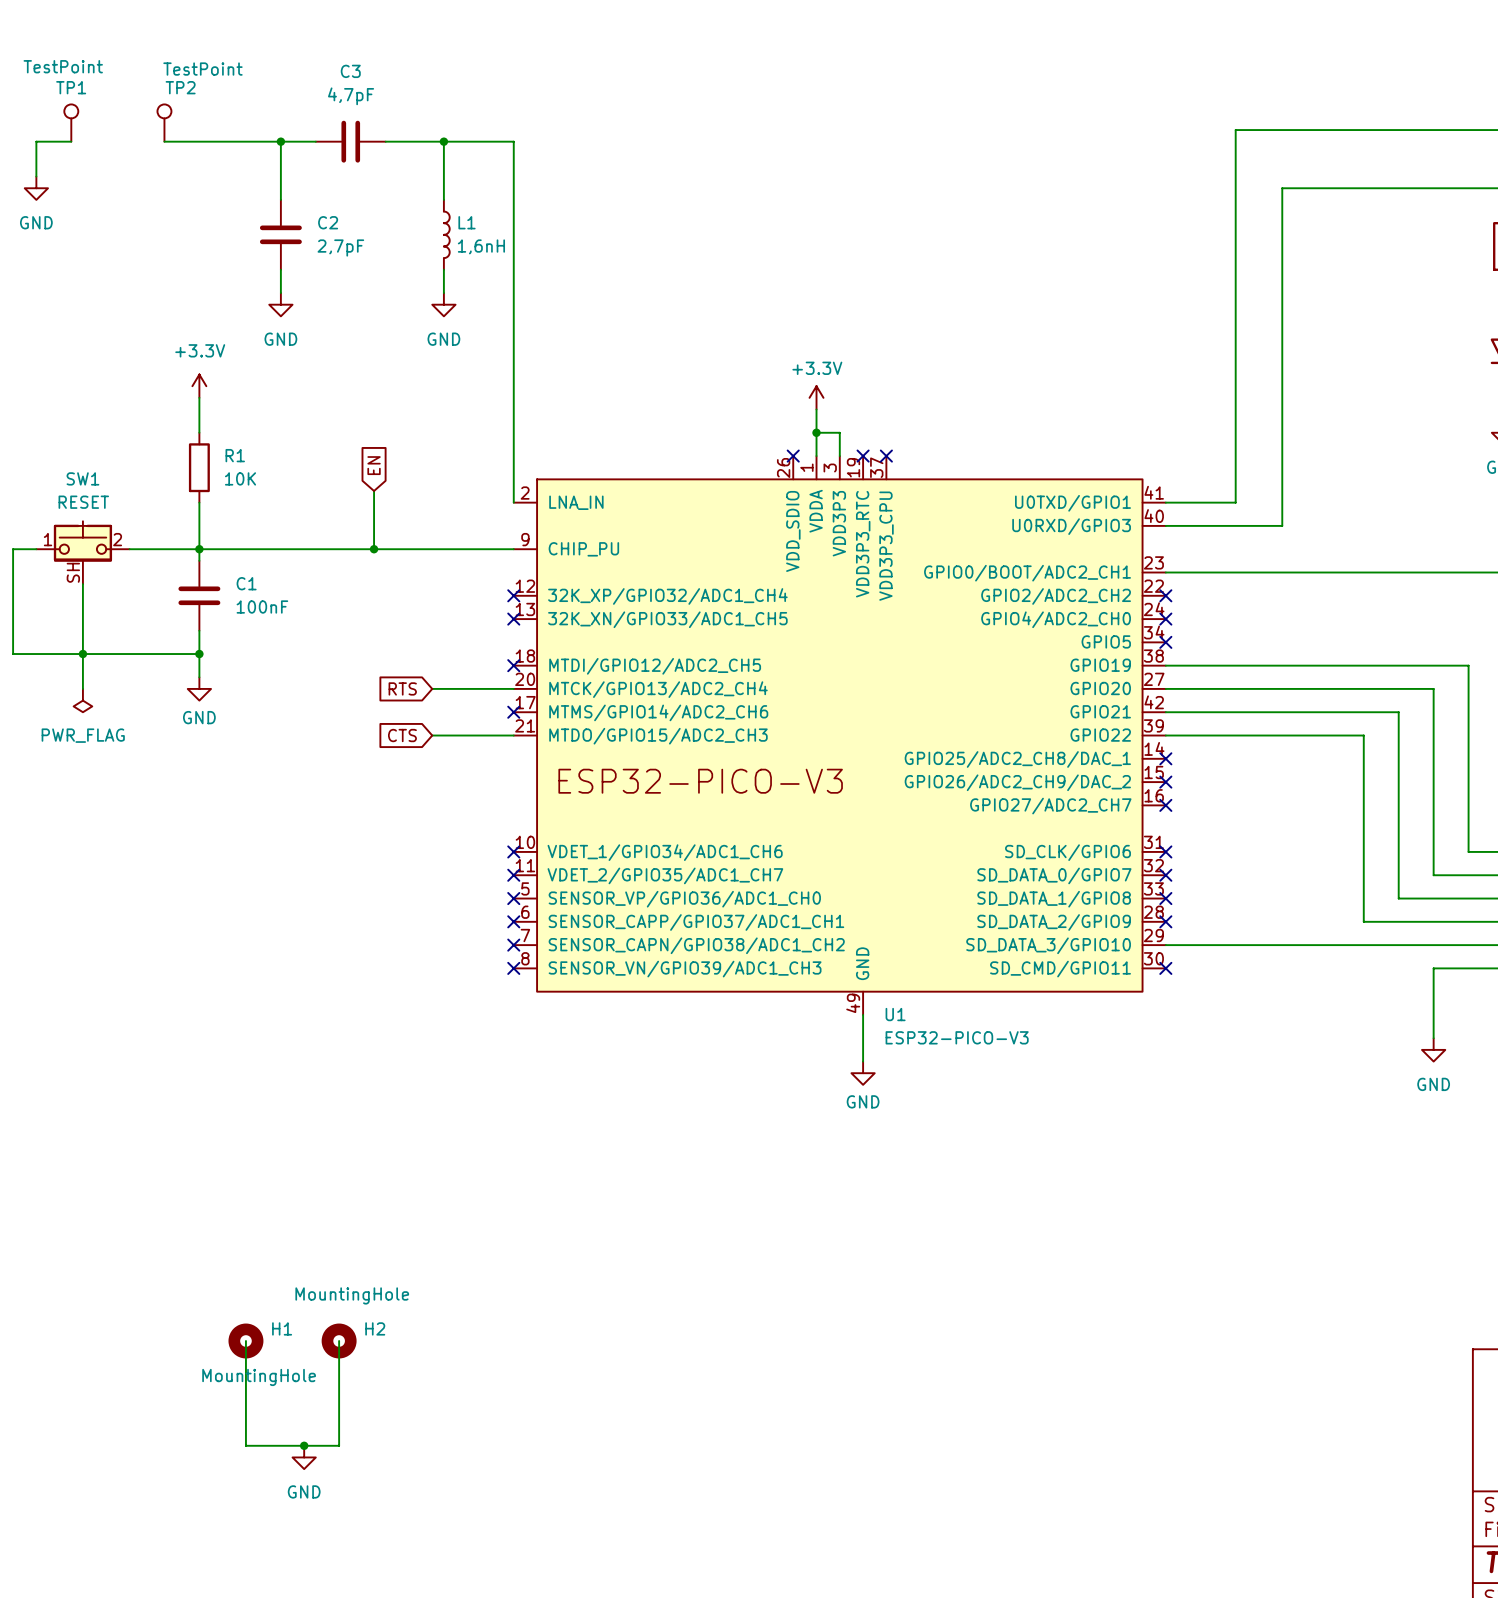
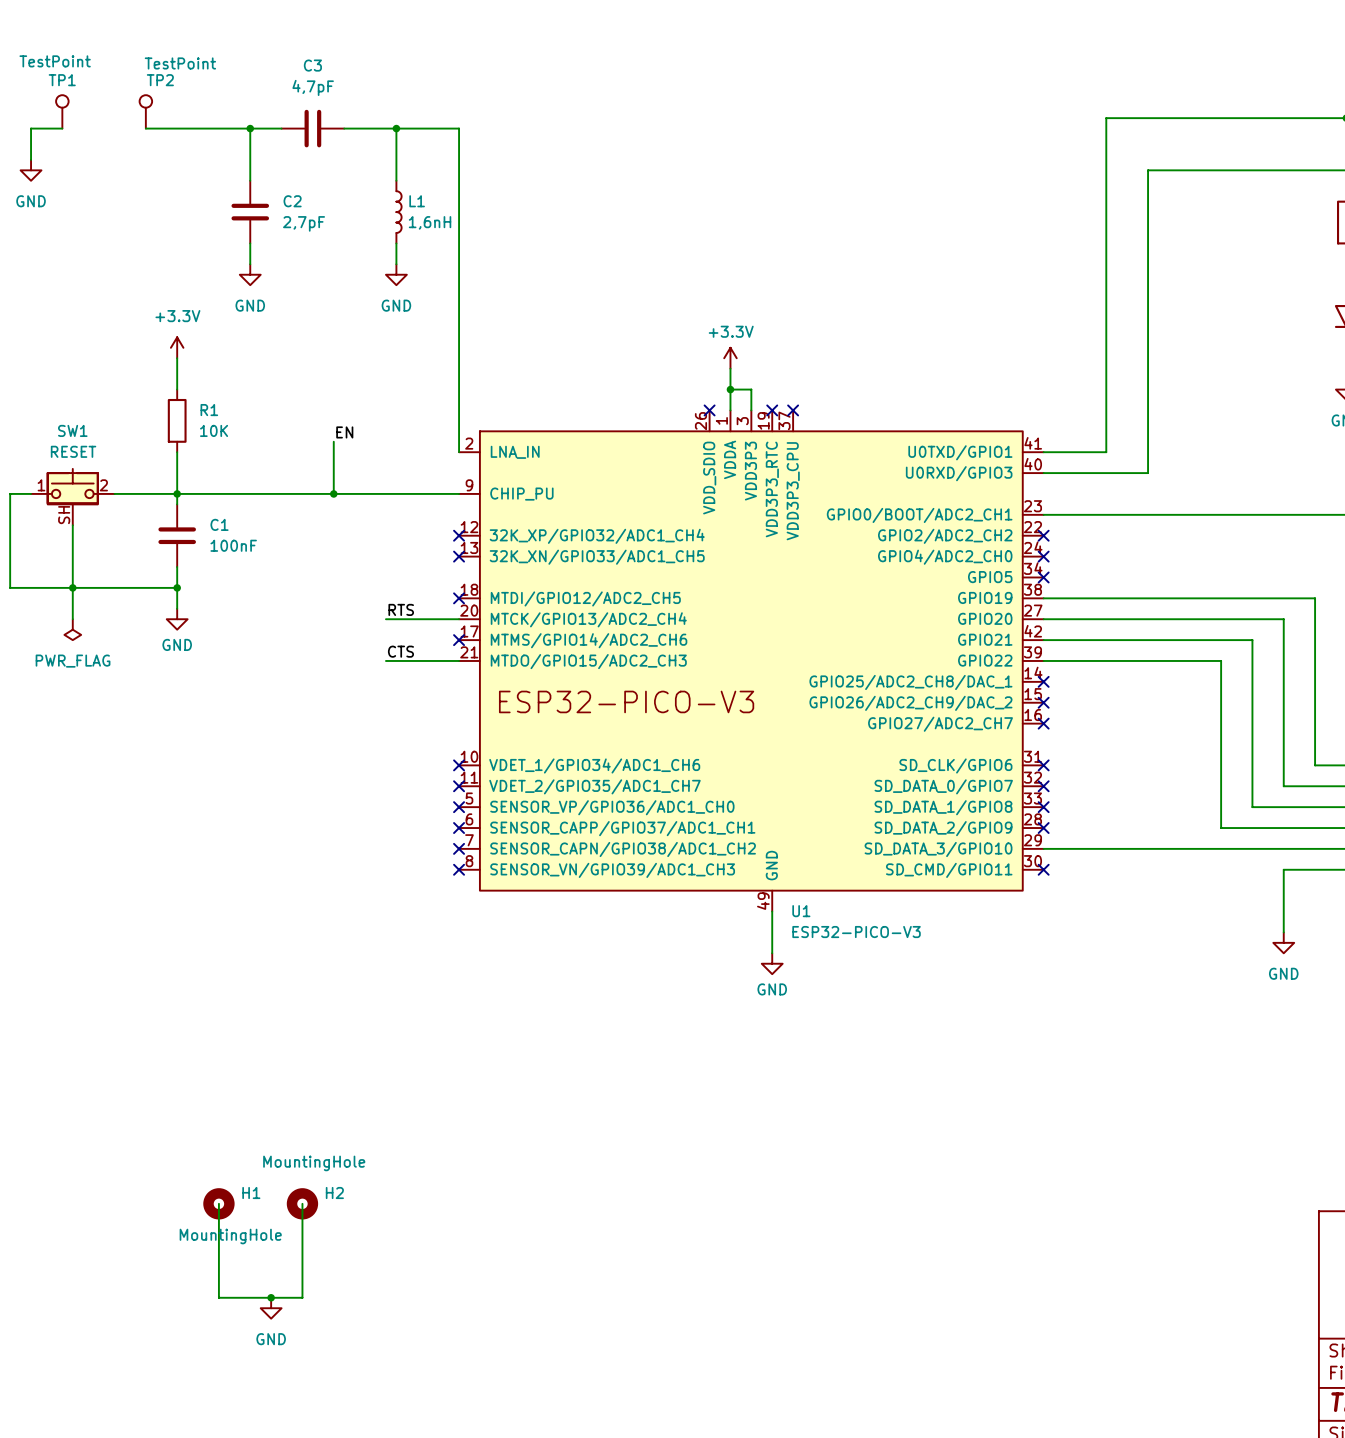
global label: EN (374, 465) -> none
label: none -> EN (344, 432)
label: none -> RTS (401, 609)
global label: RTS (402, 688) -> none
label: none -> CTS (400, 651)
global label: CTS (402, 735) -> none

